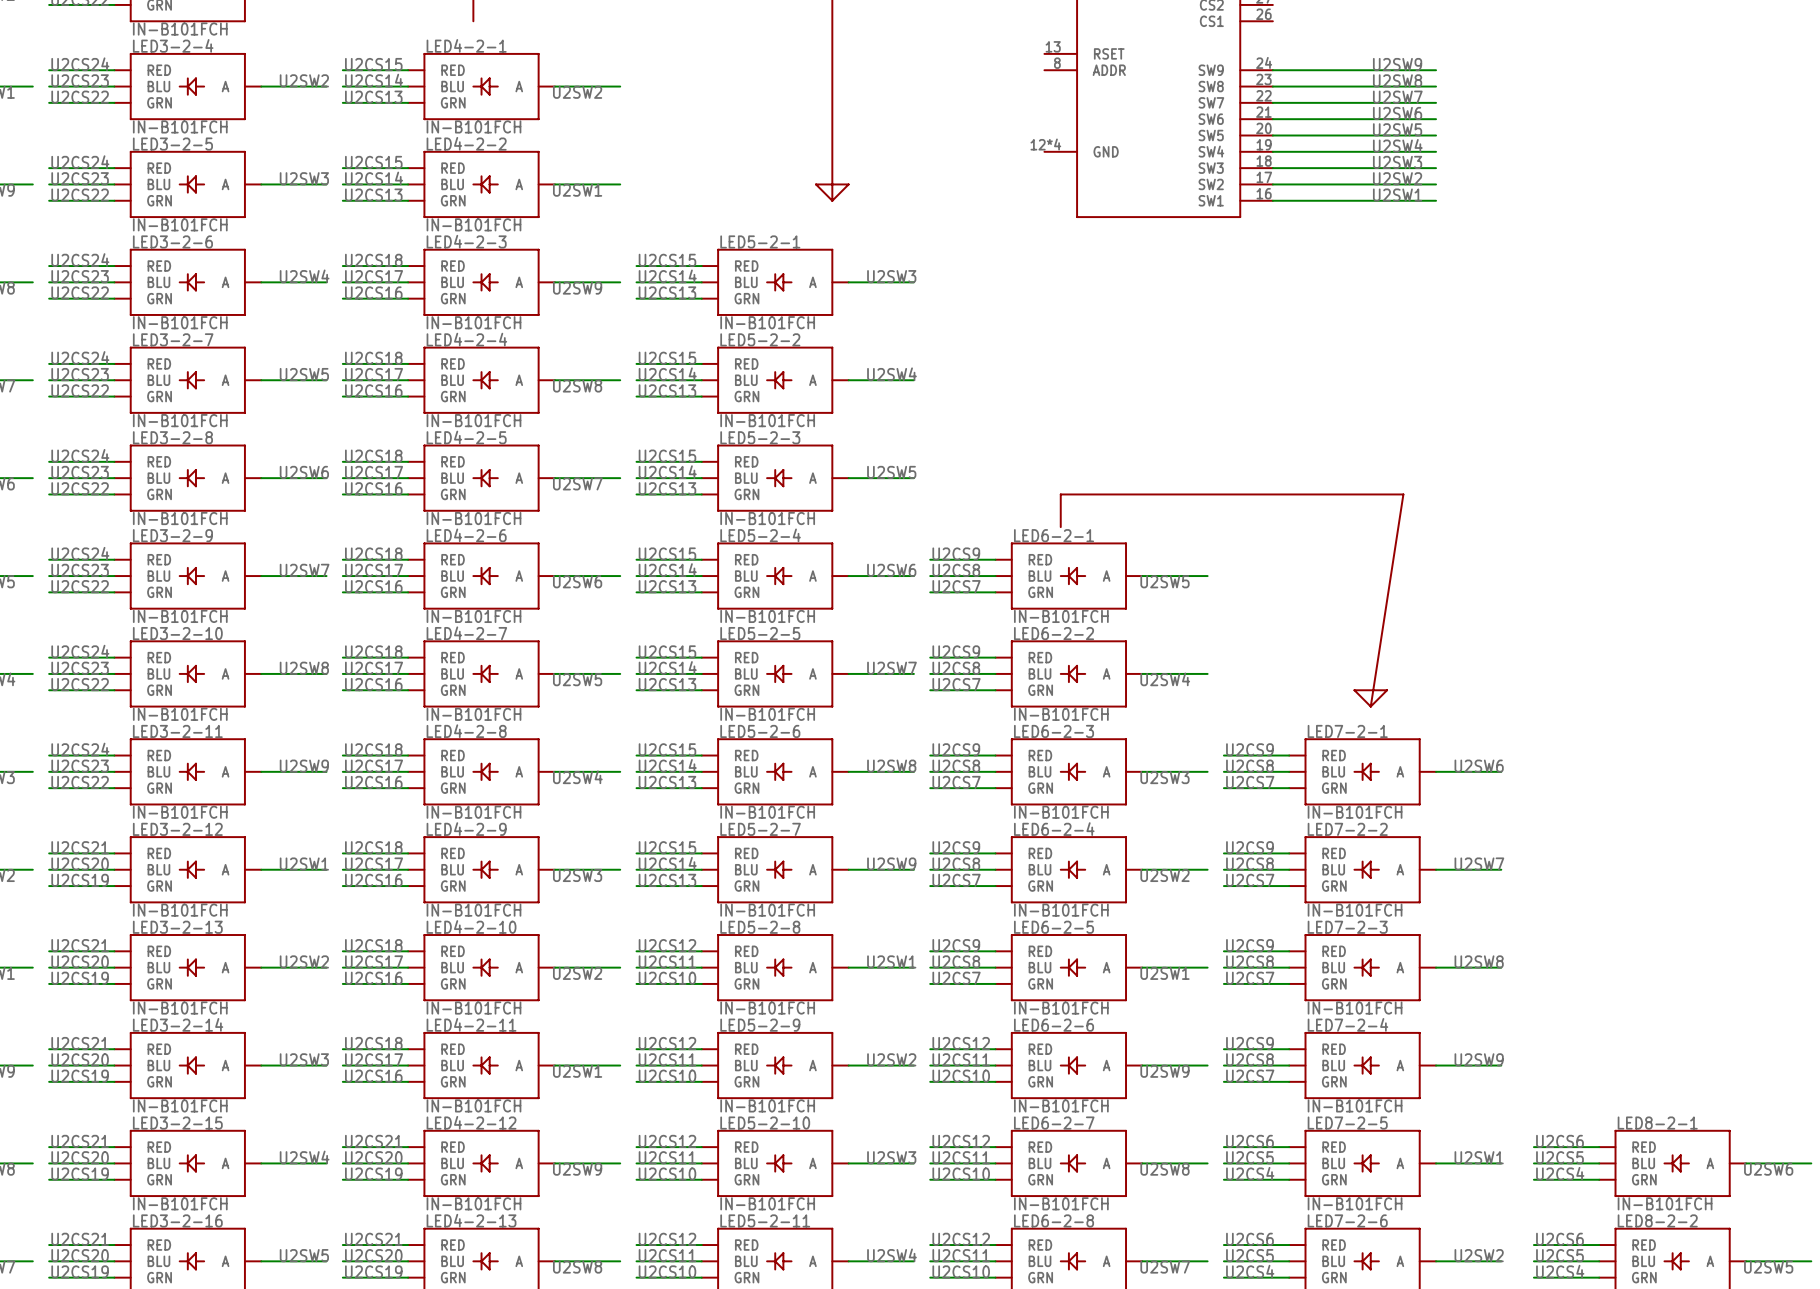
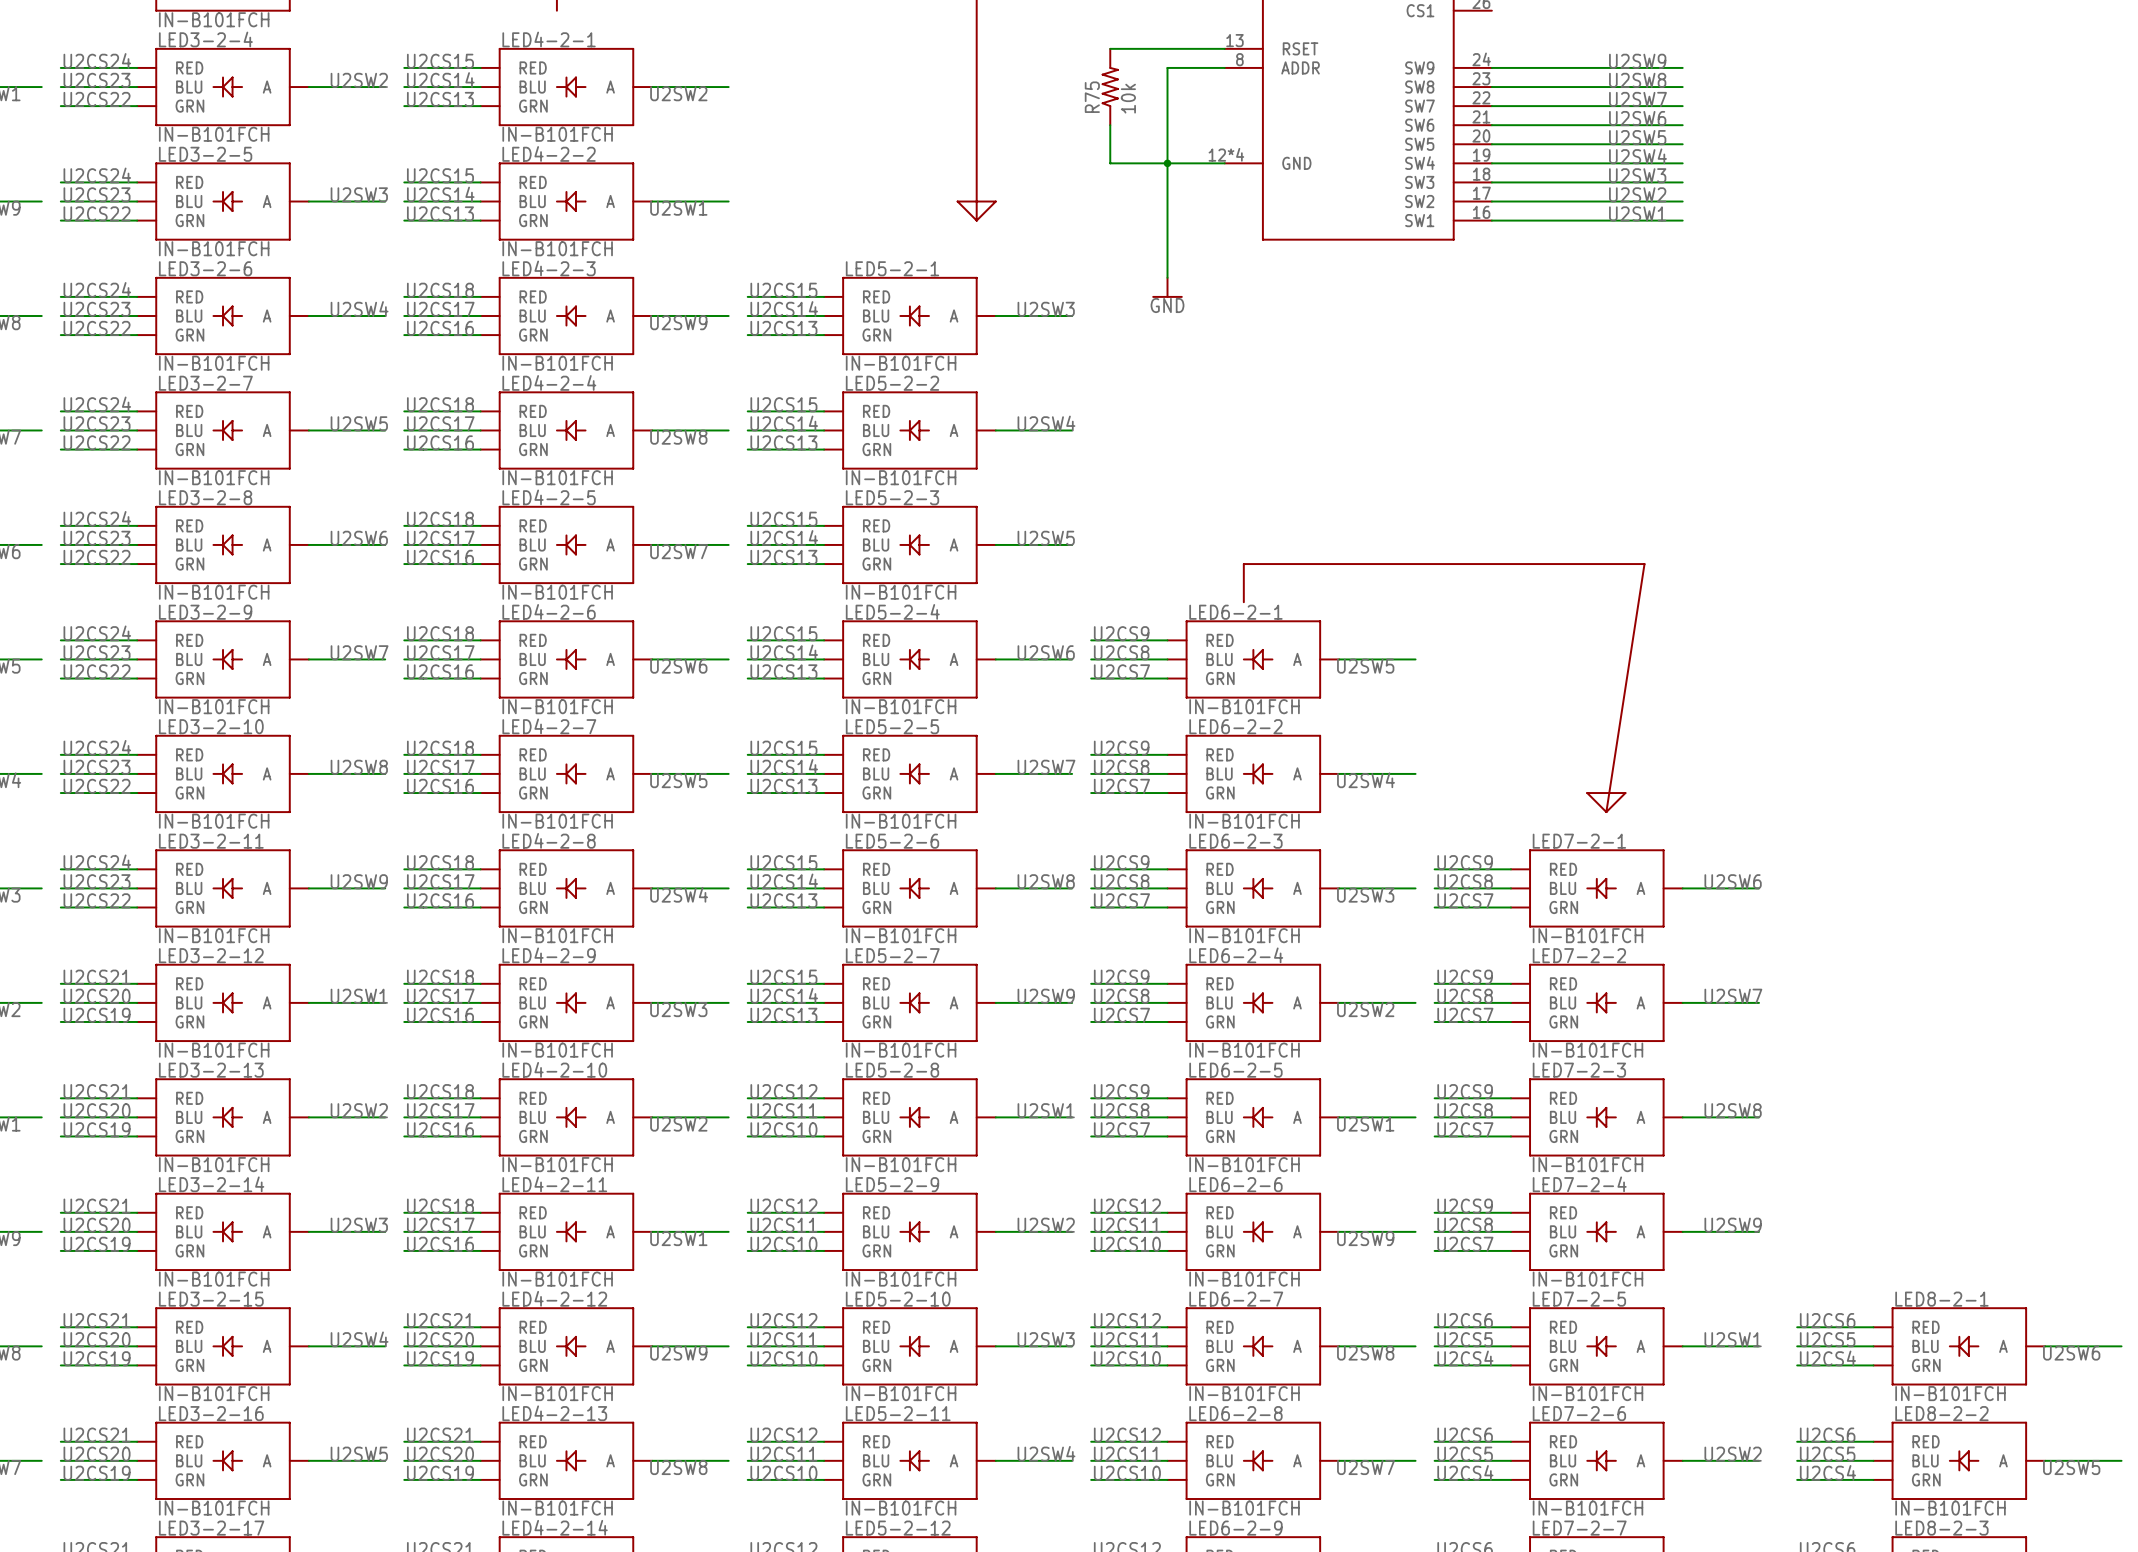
wire: none -> (1110, 48) (1224, 48)
wire: none -> (1224, 67) (1167, 67) (1167, 277)
R75: none -> 10k (1110, 87)
wire: none -> (1110, 125) (1110, 163) (1224, 163)
junction: none -> (1167, 163)
power symbol: none -> GND (1167, 287)

